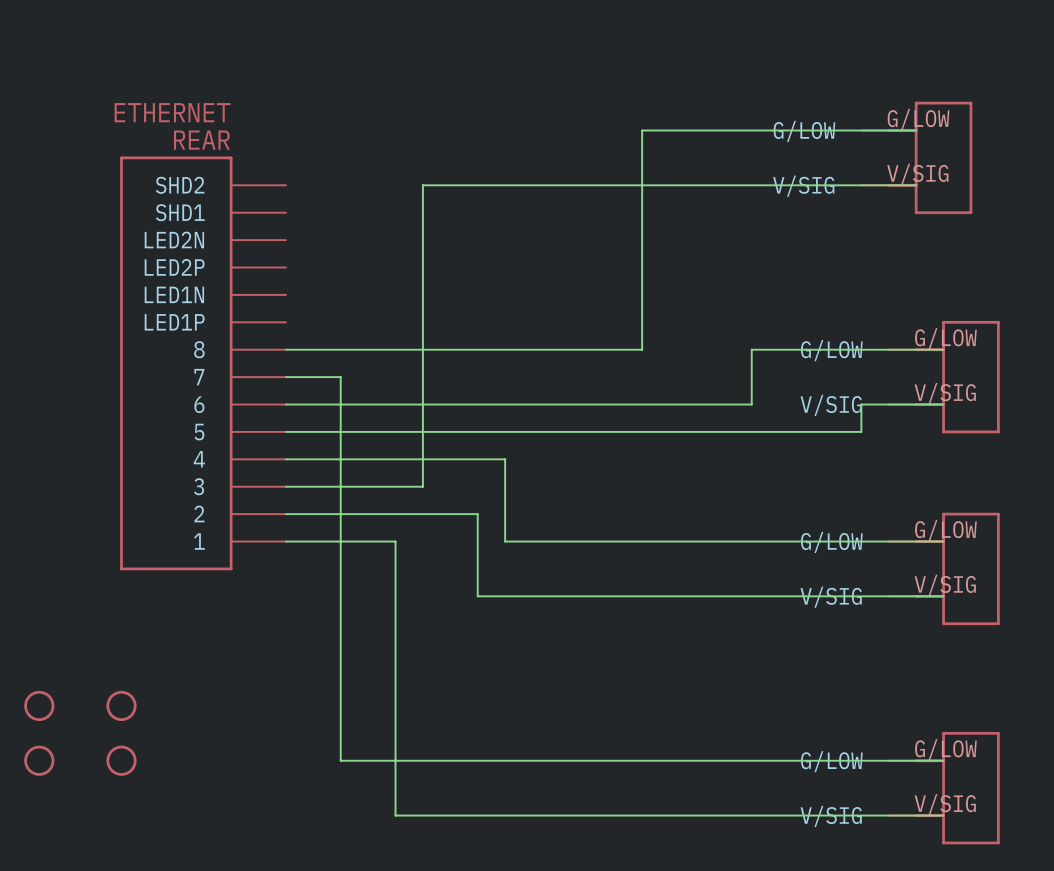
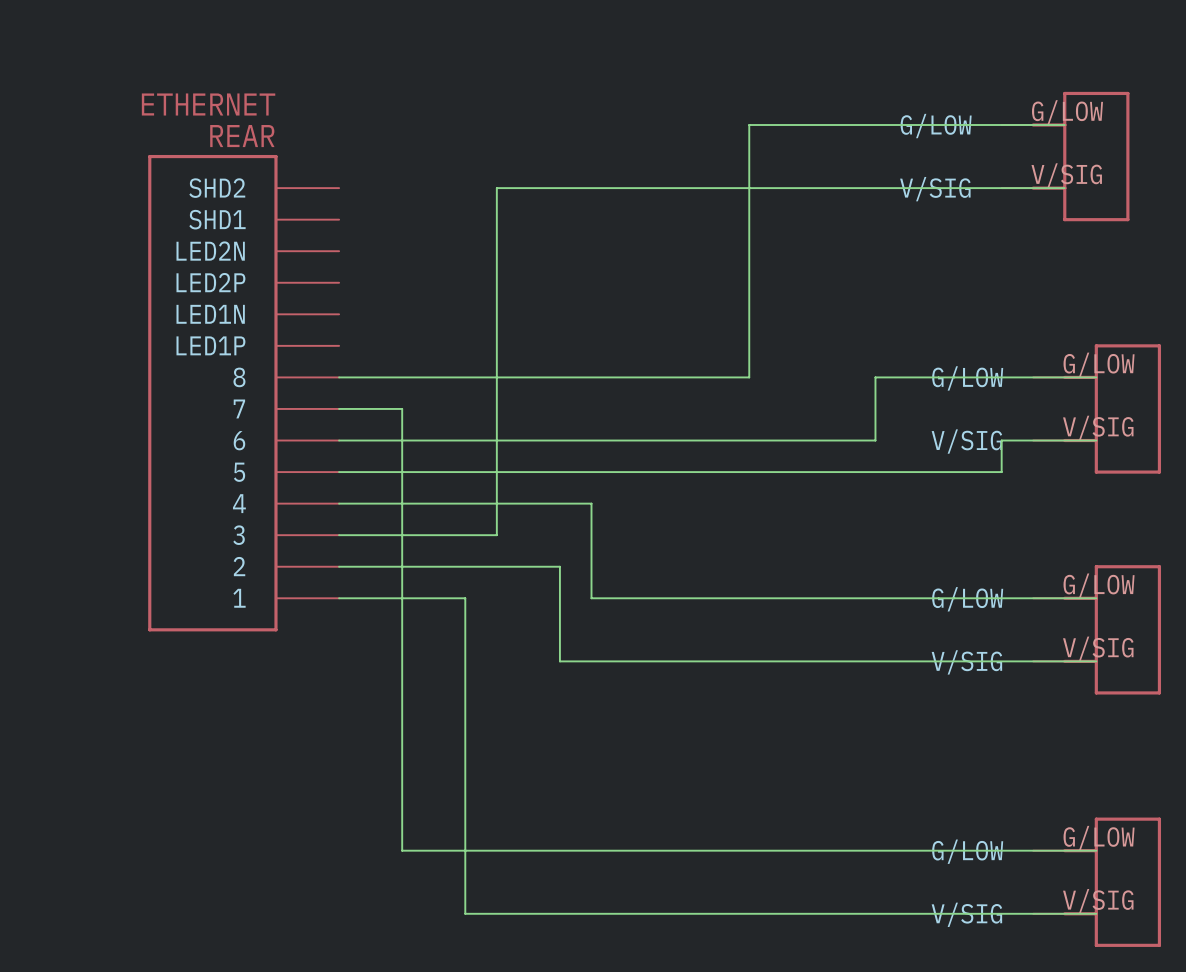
part: (39, 705) -> none
part: (121, 705) -> none
part: (39, 760) -> none
part: (121, 760) -> none

